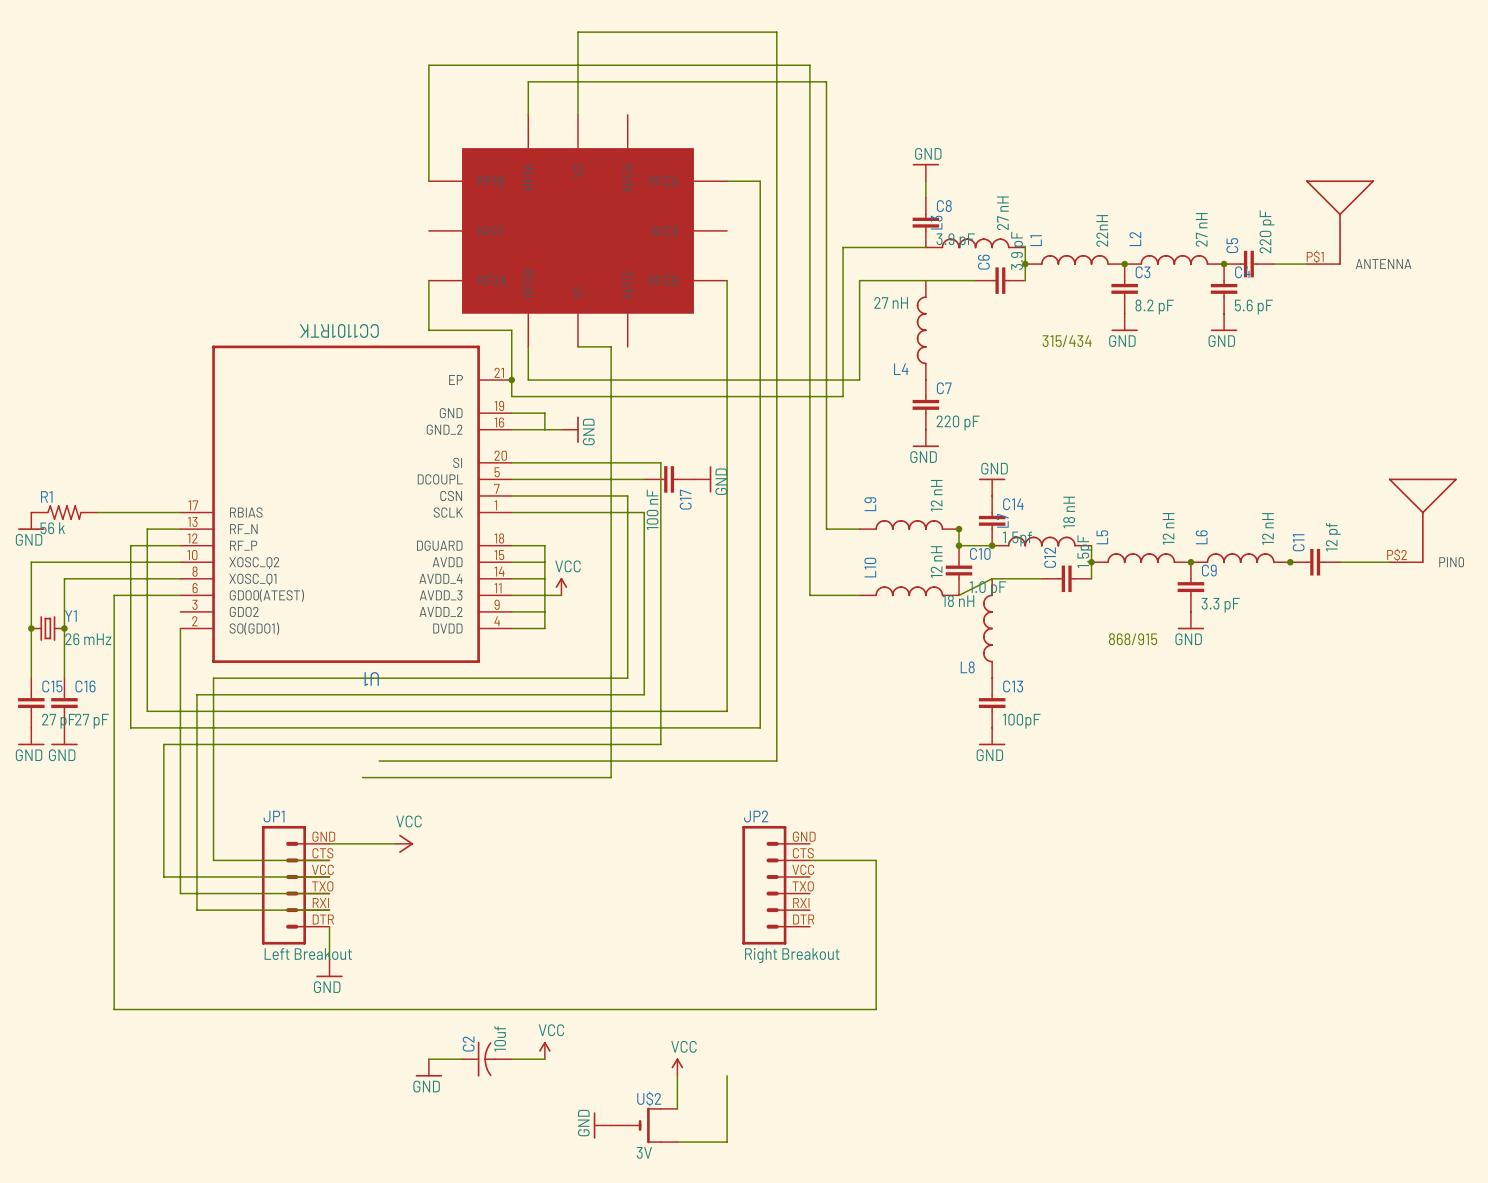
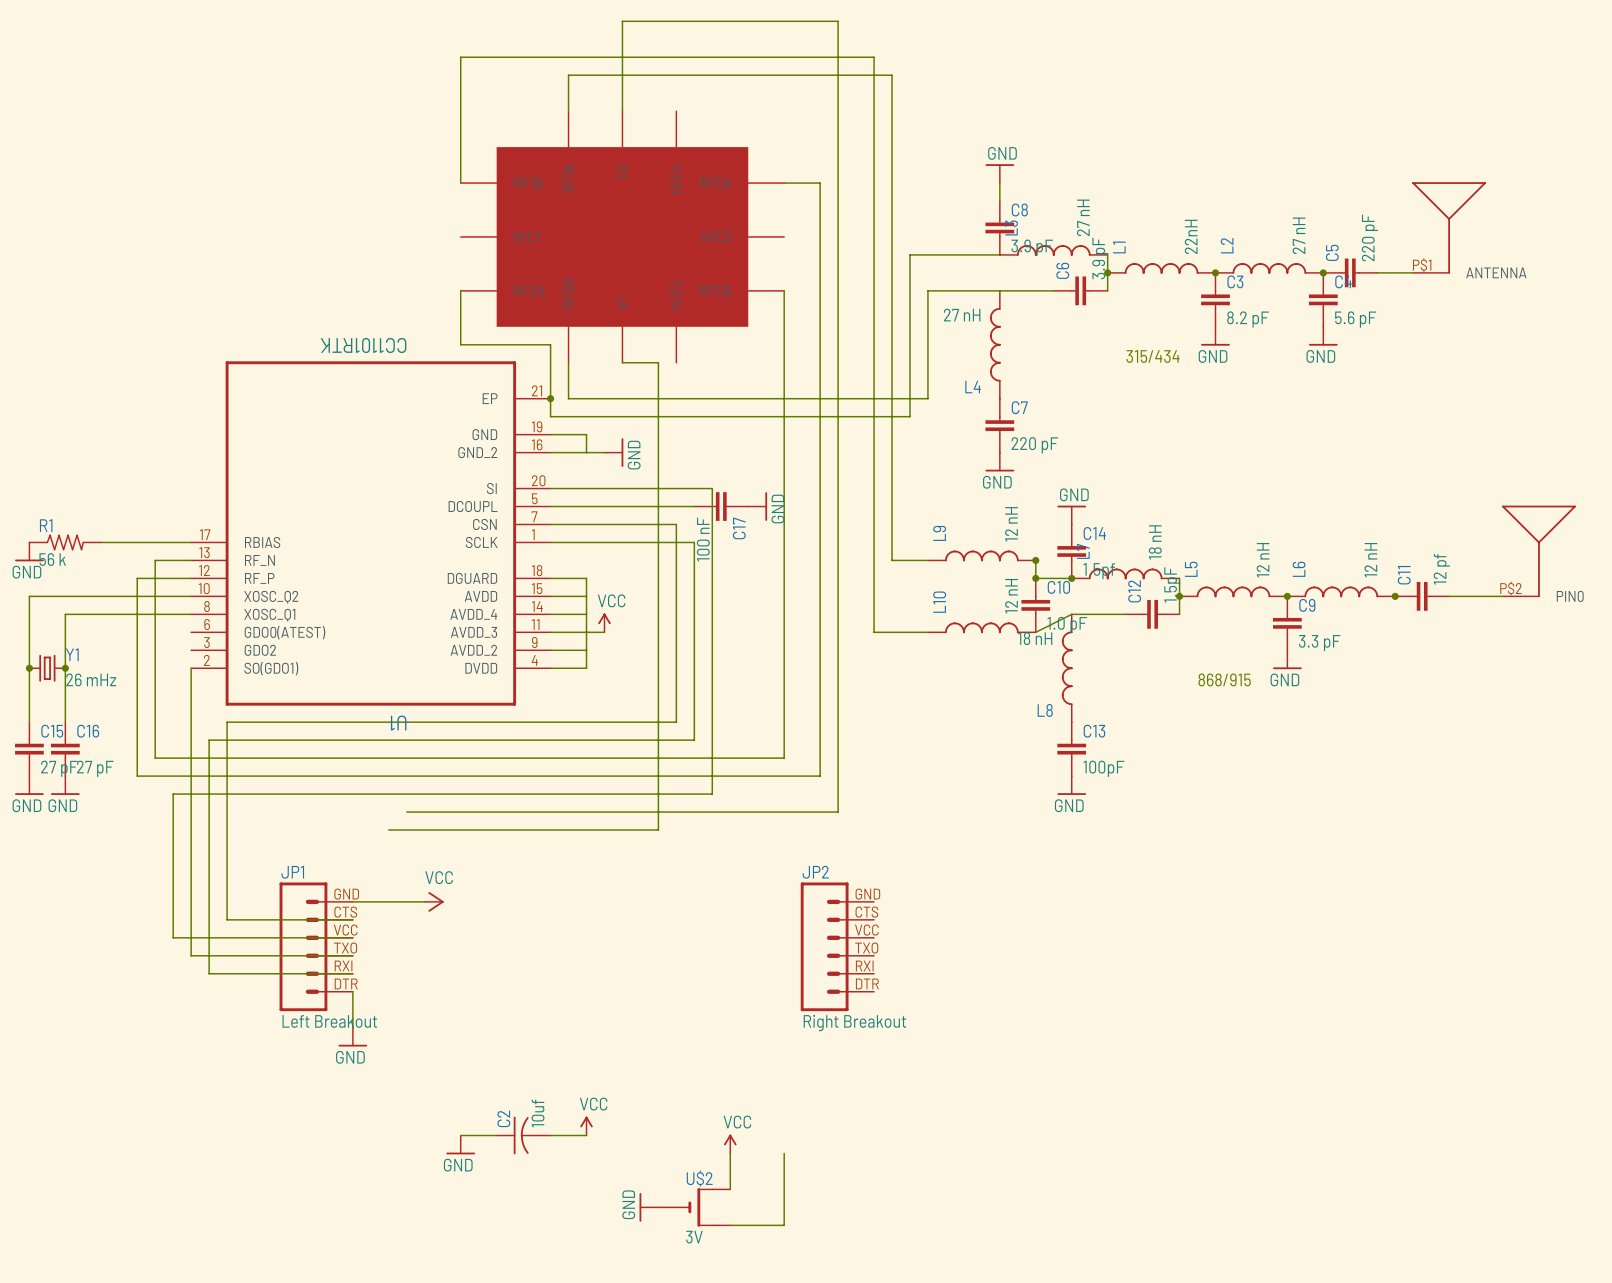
wire: (180, 595) (114, 595) (114, 1009) (876, 1009) (876, 860) (809, 860) -> none

